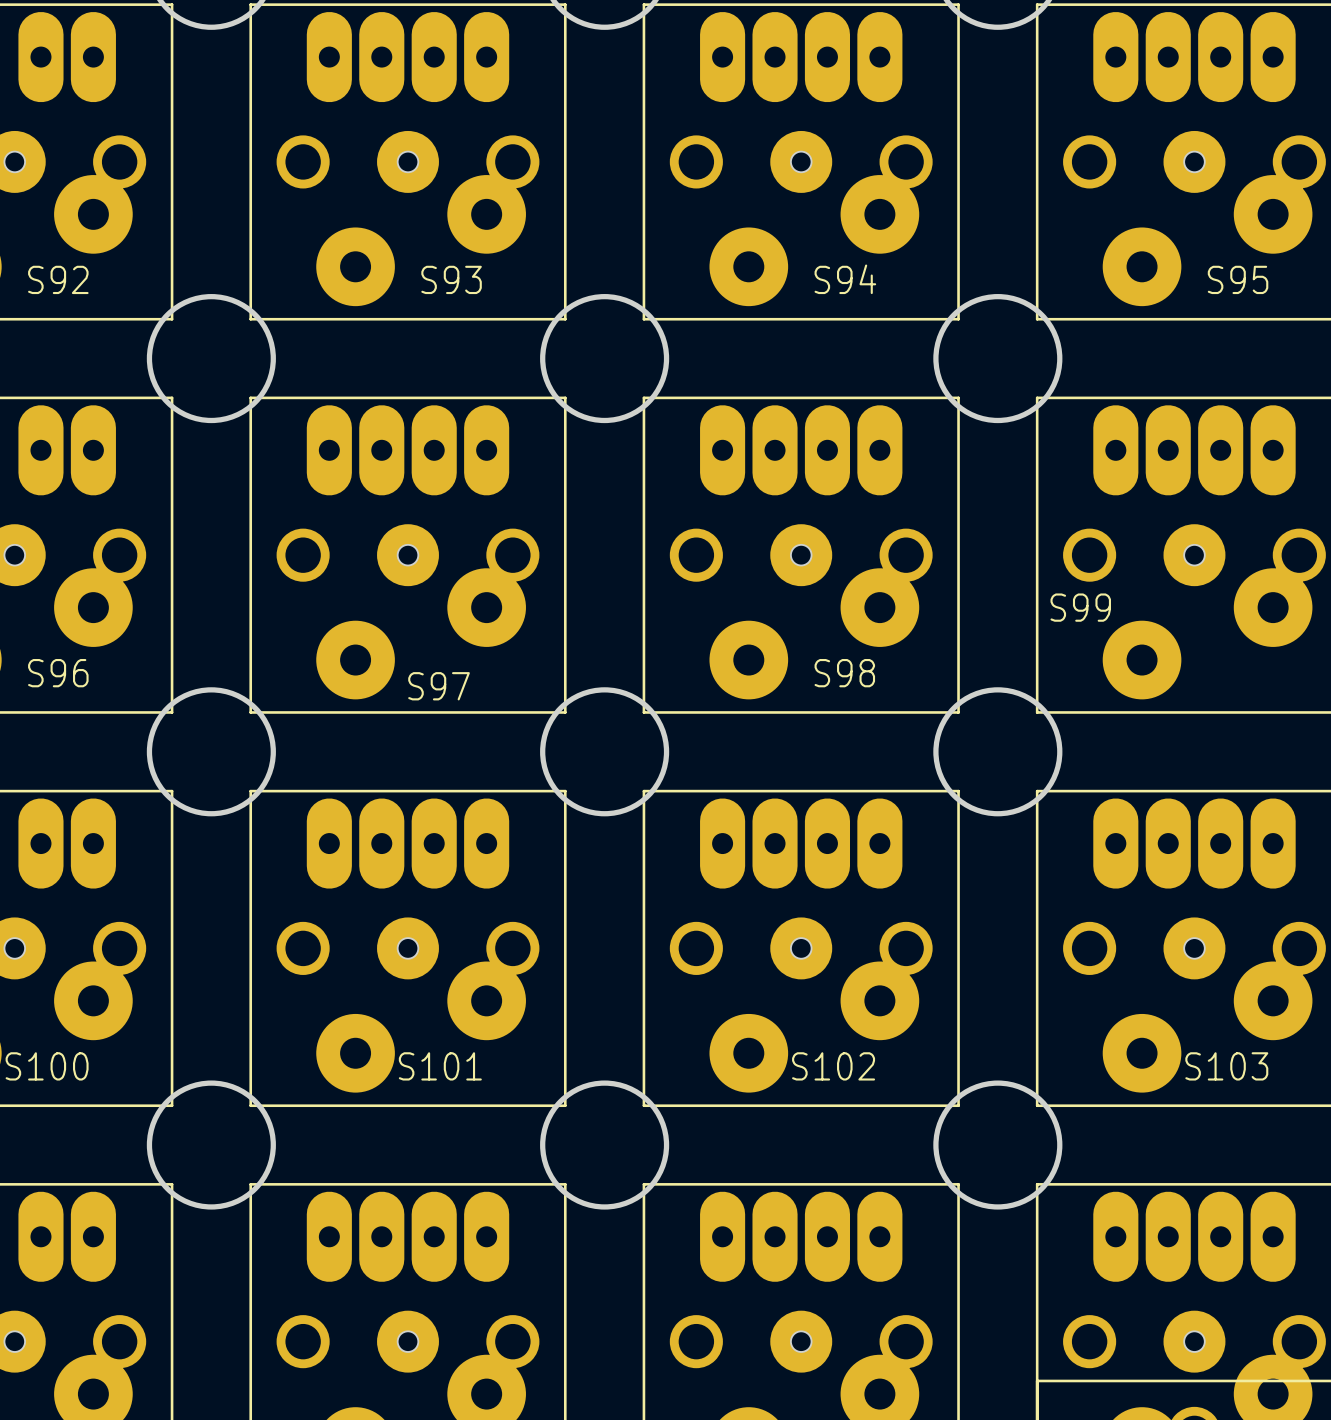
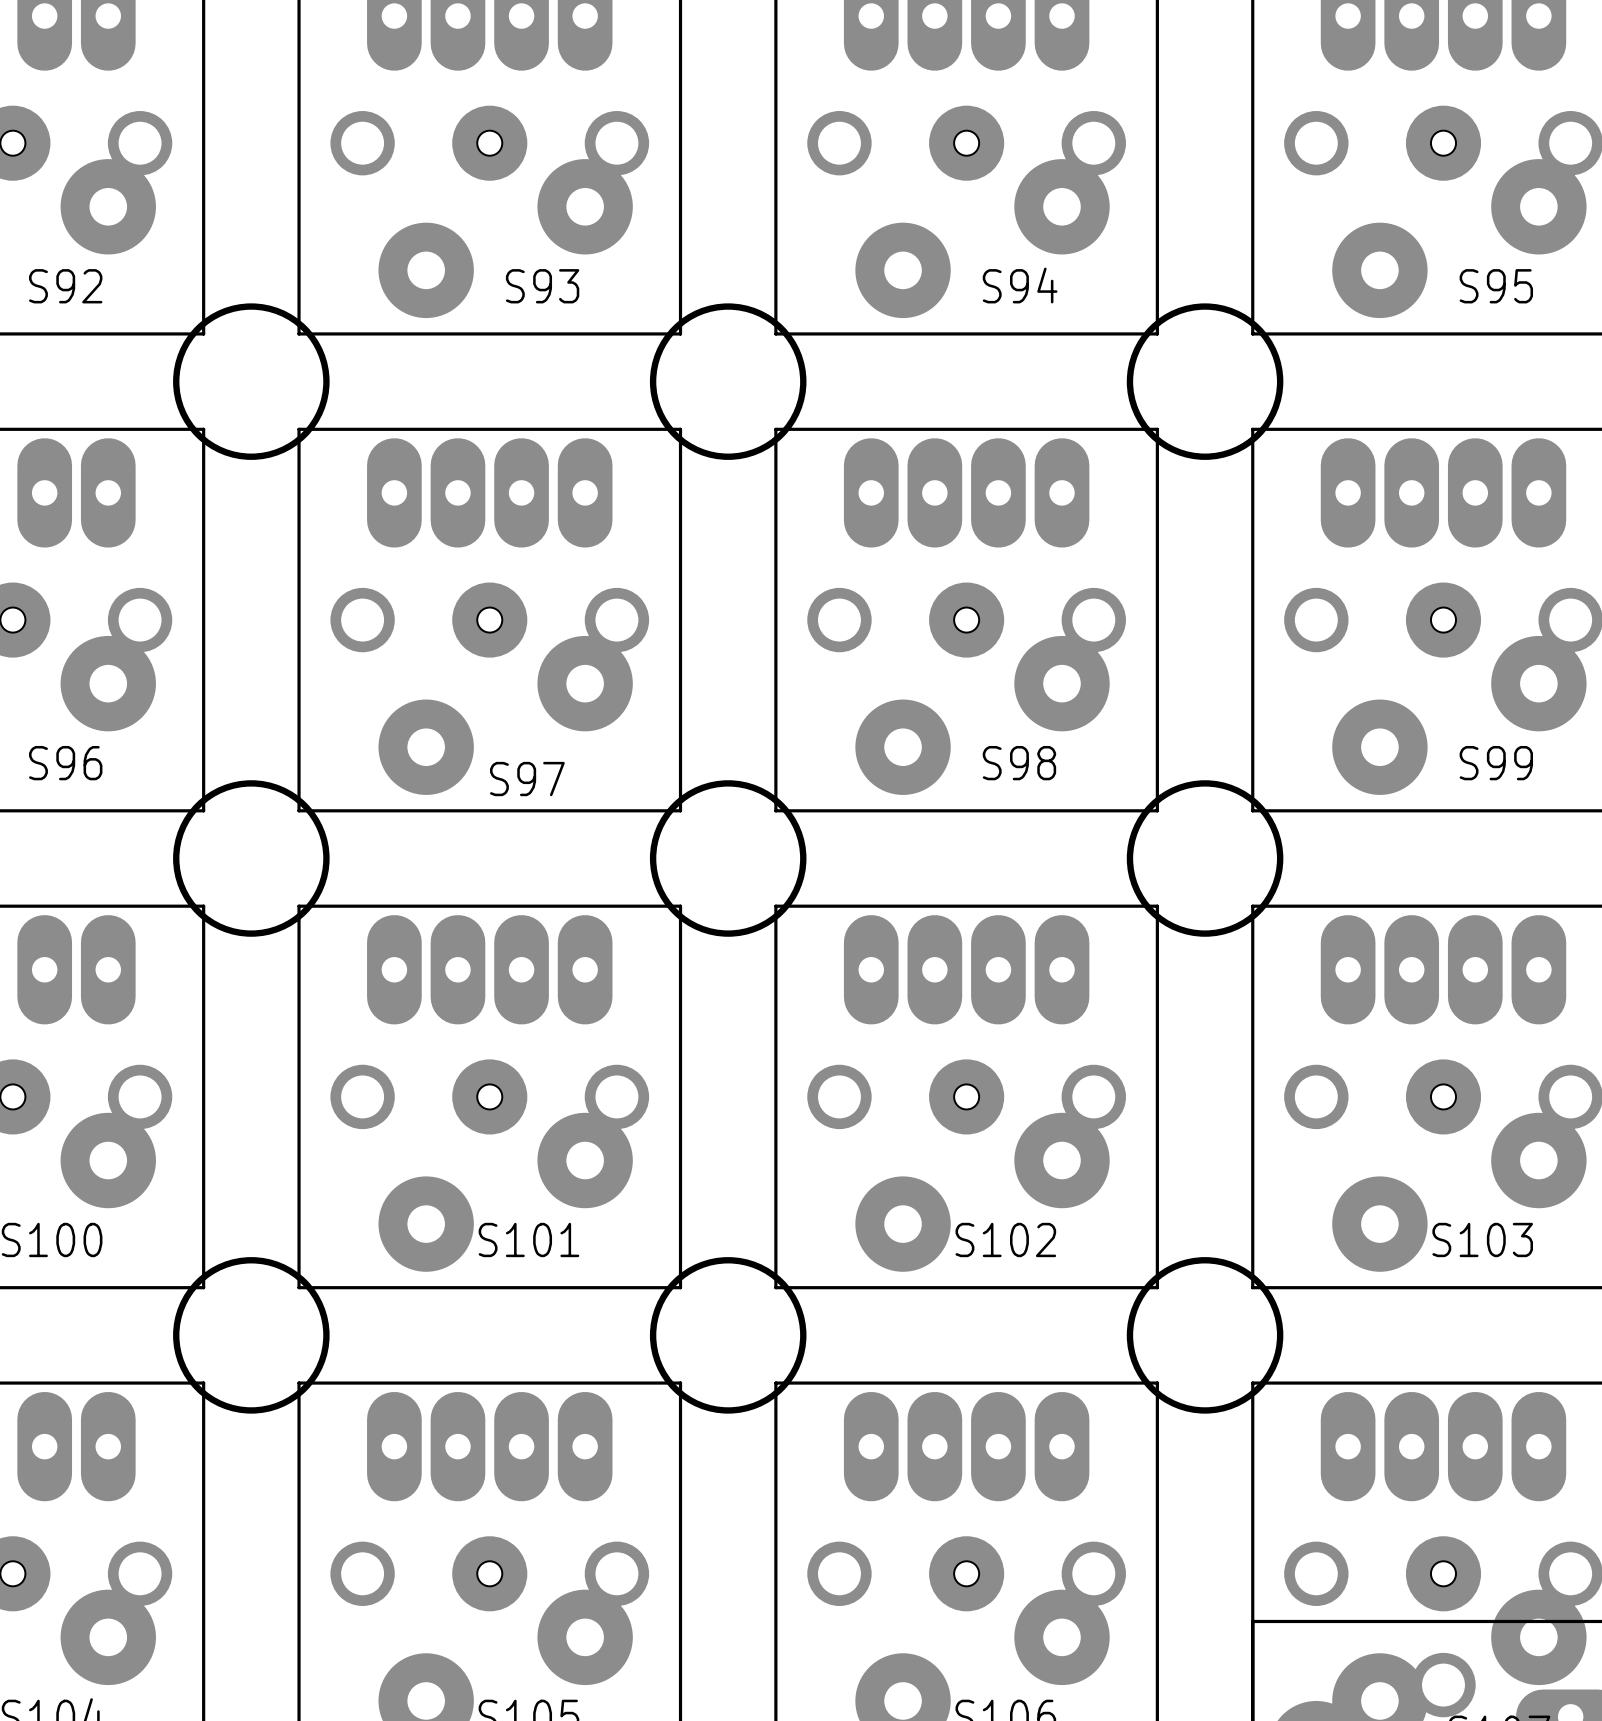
S99 name position: S99 (1080, 607) -> S99 (1496, 763)

